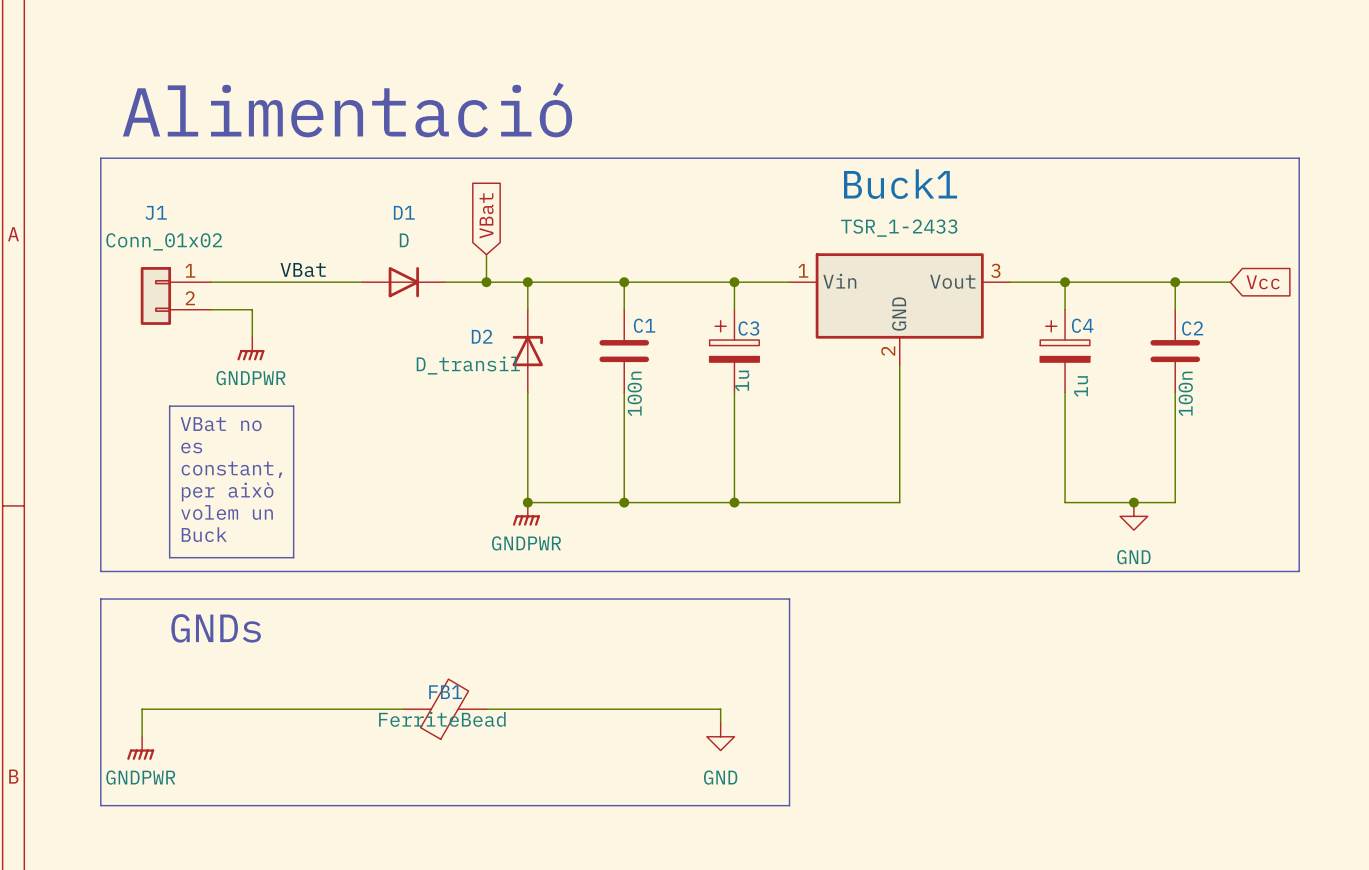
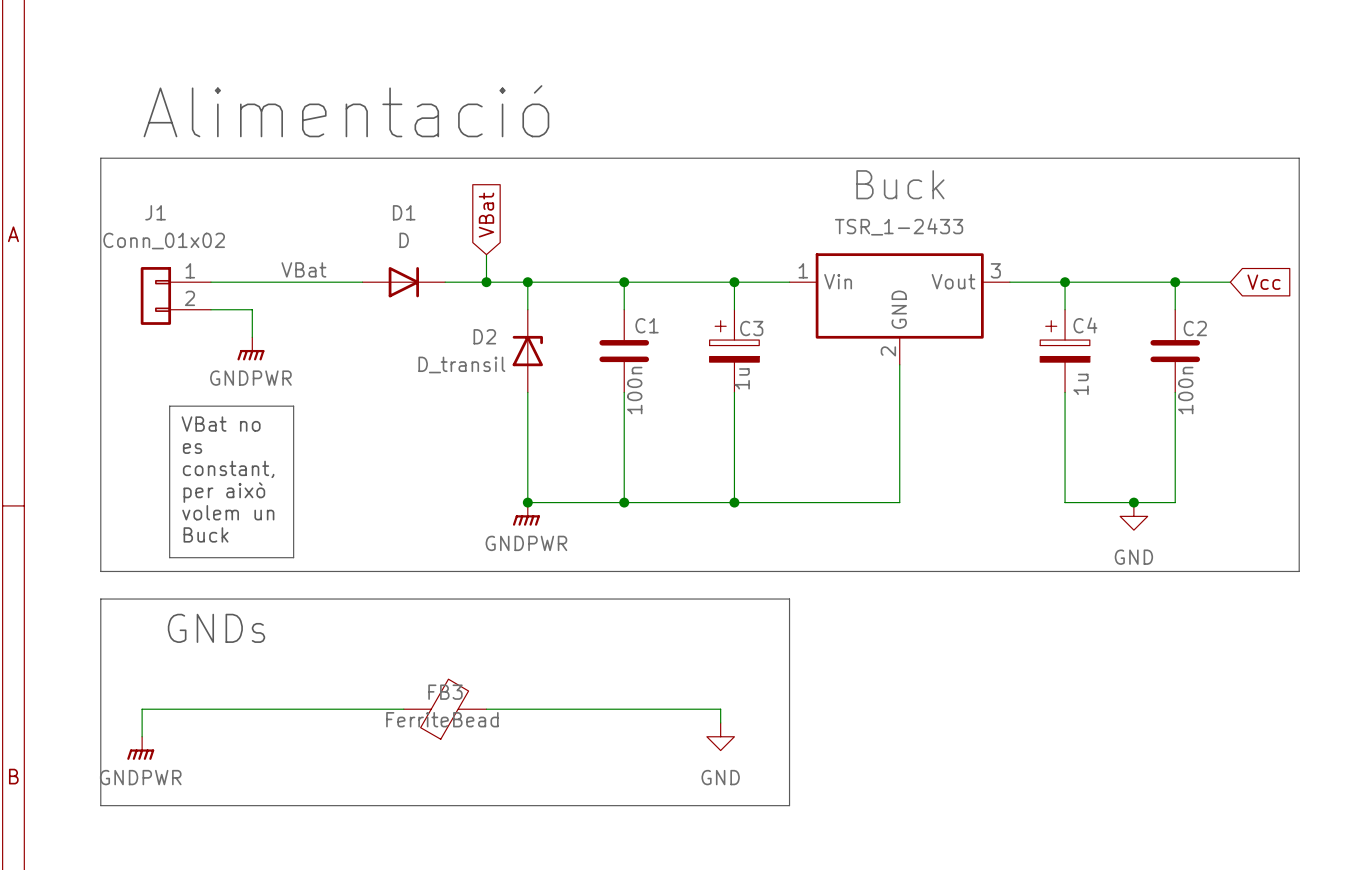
Buck1 name: Buck1 (900, 184) -> Buck (900, 184)
FB1 name: FB1 (445, 692) -> FB3 (445, 692)

